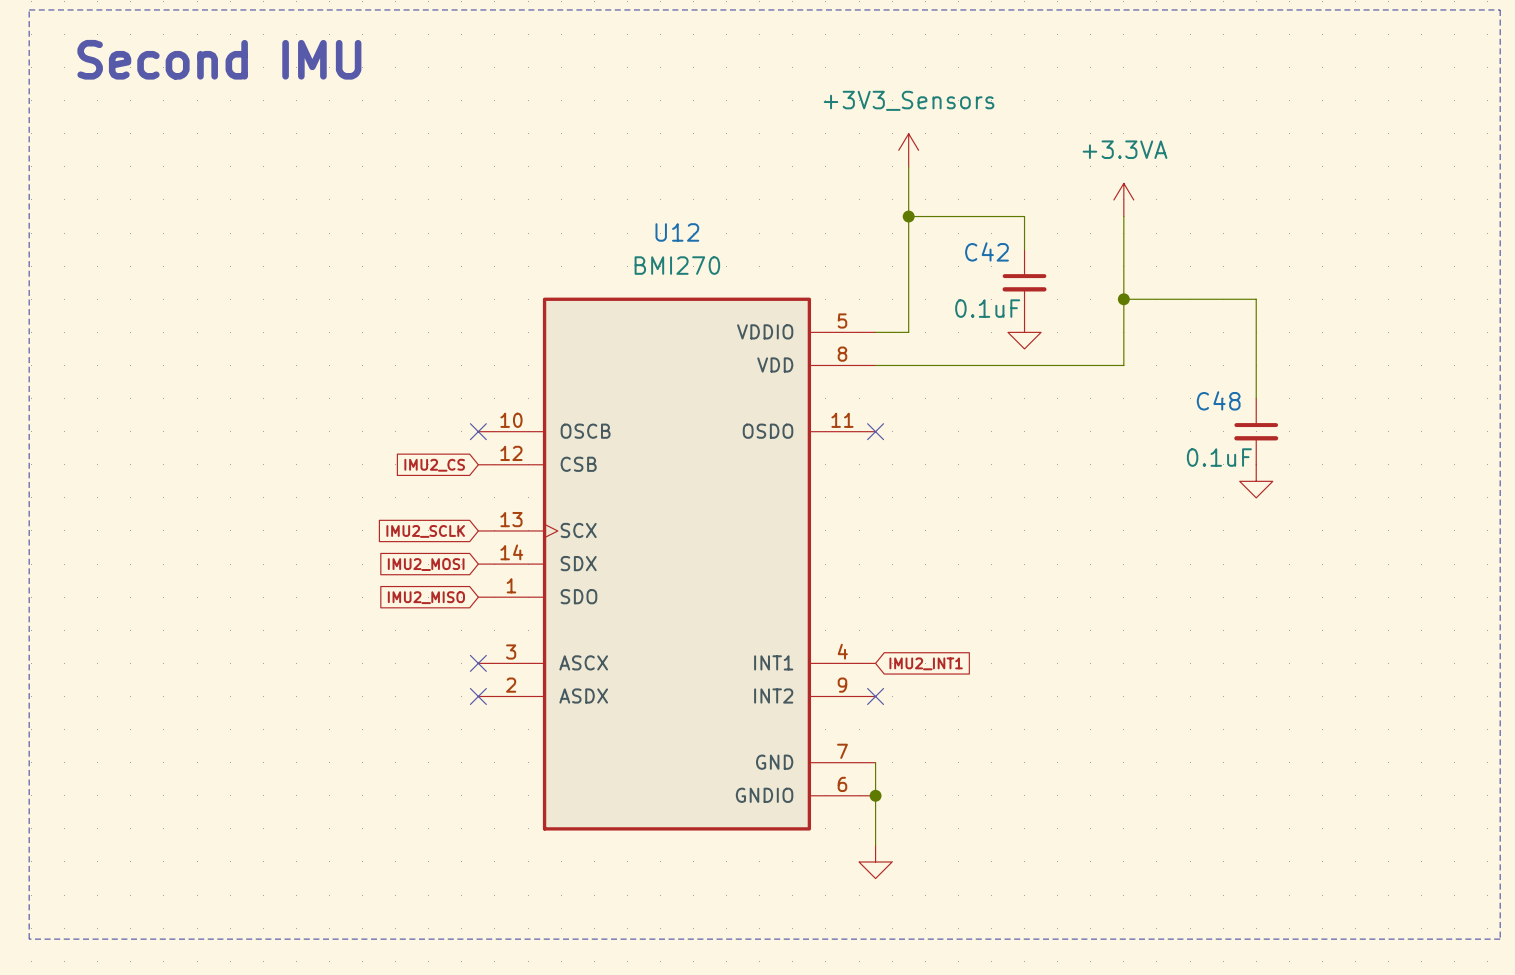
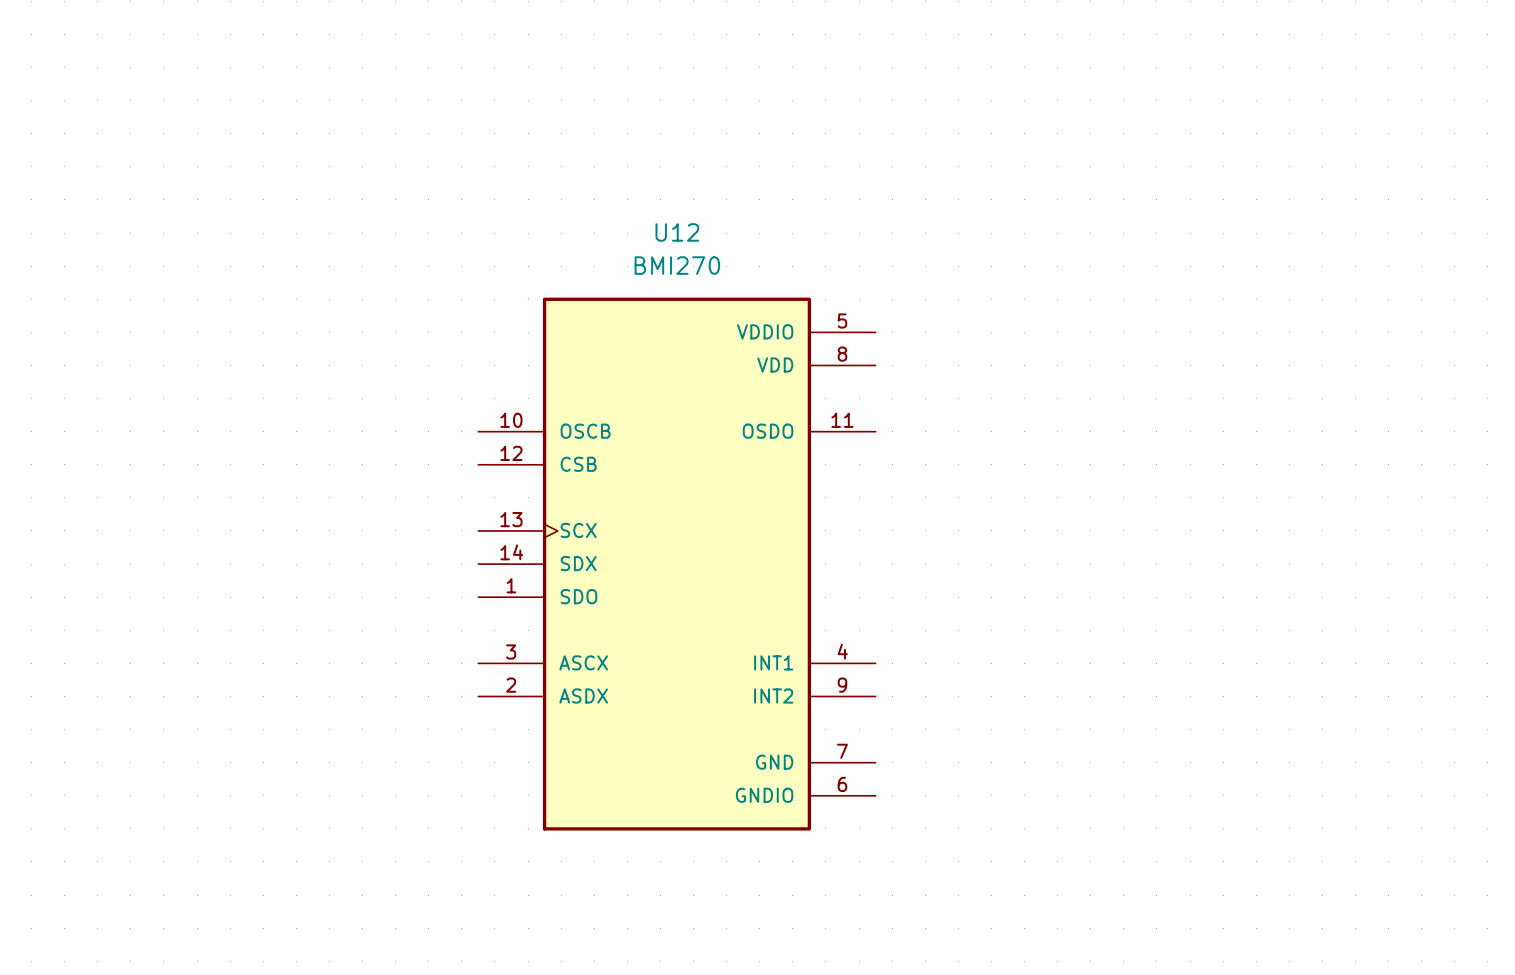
line: (29, 9) (1500, 9) (1500, 939) (29, 939) (29, 9) -> none
text: Second IMU (219, 59) -> none
power symbol: +3V3_Sensors (908, 150) -> none
wire: (908, 166) (908, 332) (875, 332) -> none
power symbol: +3.3VA (1123, 199) -> none
wire: (908, 216) (1024, 216) (1024, 249) -> none
junction: (908, 216) -> none
wire: (1123, 216) (1123, 365) (875, 365) -> none
C42: 0.1uF (1024, 282) -> none
wire: (1123, 299) (1256, 299) (1256, 398) -> none
junction: (1123, 299) -> none
power symbol: (1024, 332) -> none
no-connect mark: (478, 431) -> none
no-connect mark: (875, 431) -> none
C48: 0.1uF (1256, 431) -> none
global label: IMU2_CS (434, 465) -> none
power symbol: (1256, 481) -> none
global label: IMU2_SCLK (425, 531) -> none
global label: IMU2_MOSI (426, 564) -> none
global label: IMU2_MISO (426, 597) -> none
no-connect mark: (478, 663) -> none
global label: IMU2_INT1 (926, 663) -> none
no-connect mark: (478, 696) -> none
no-connect mark: (875, 696) -> none
wire: (875, 762) (875, 845) -> none
junction: (875, 795) -> none
power symbol: (875, 861) -> none

